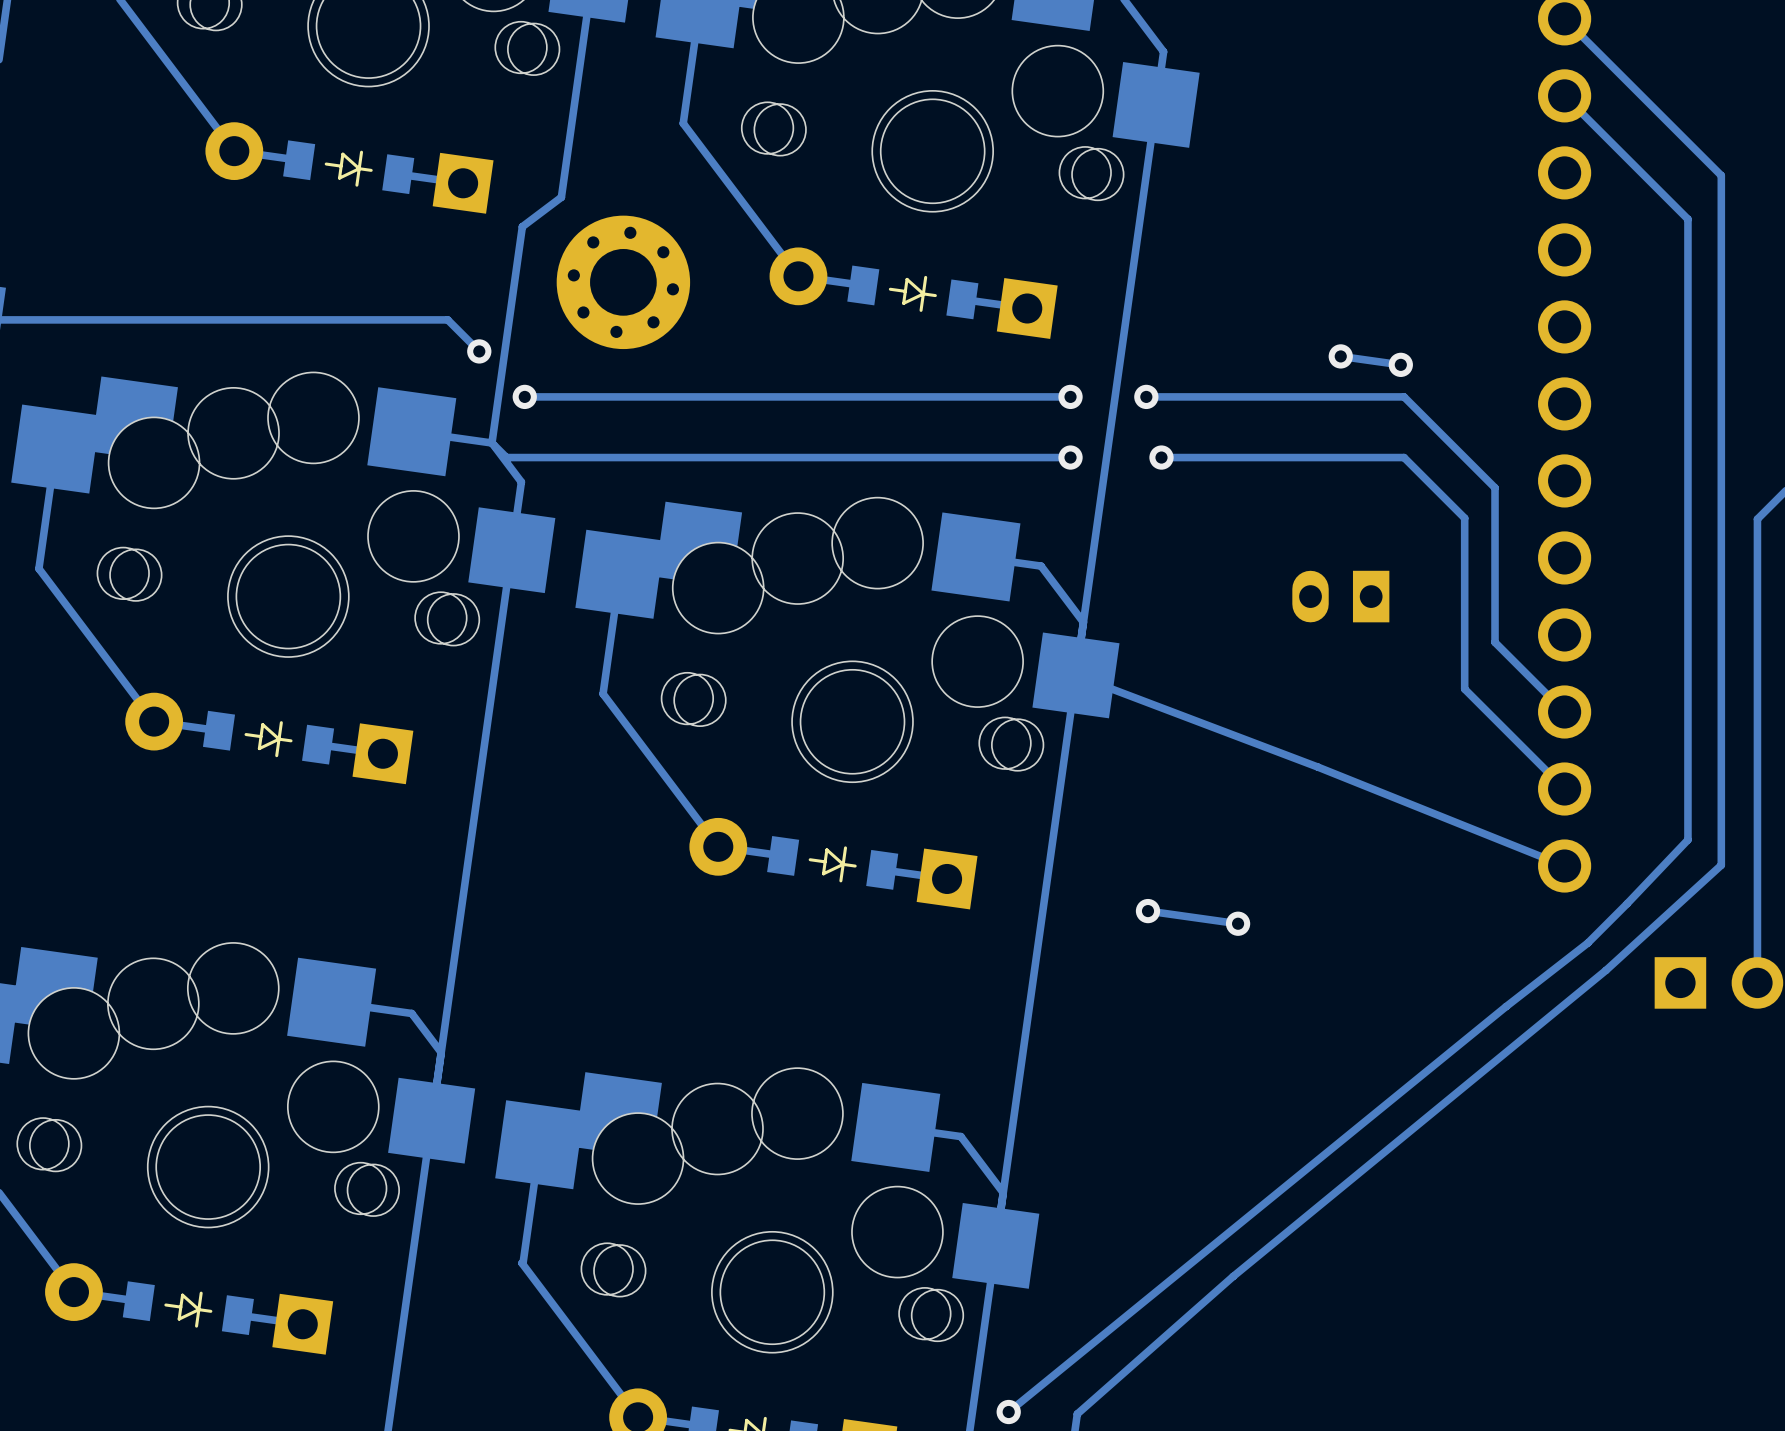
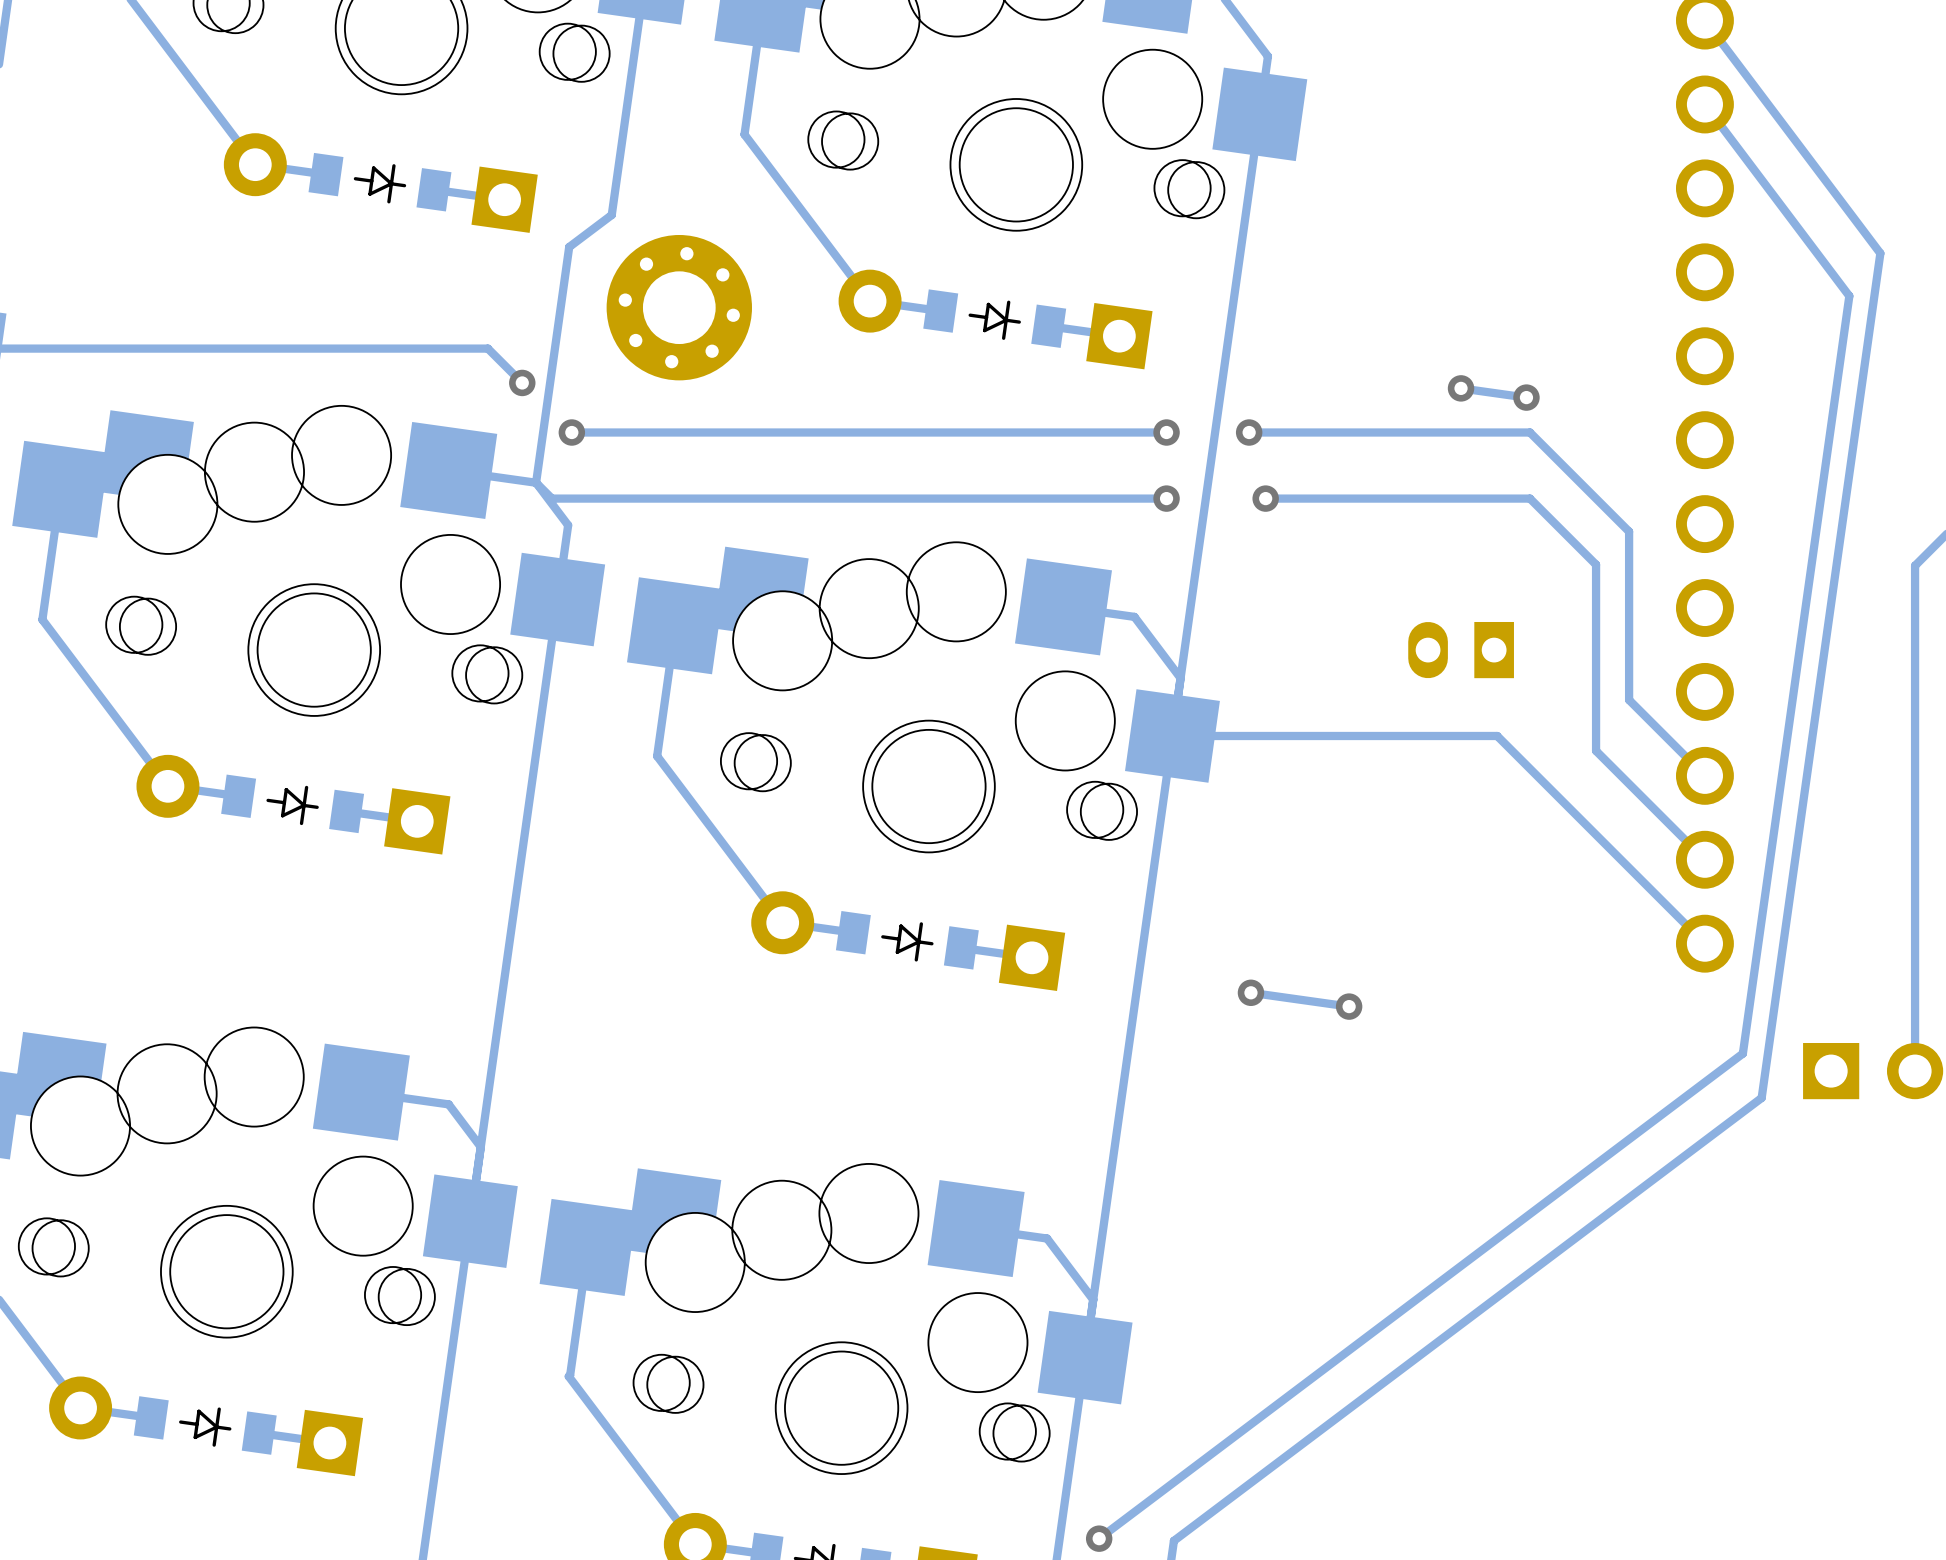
track: (1564, 18) (1721, 175) (1721, 865) (1606, 970) (1233, 1276) (1077, 1414) -> (1704, 20) (1880, 253) (1761, 1097) (1173, 1540)
track: (1564, 95) (1687, 219) (1687, 839) (1587, 943) (1506, 1006) (1008, 1412) -> (1704, 104) (1849, 296) (1742, 1053) (1099, 1538)
track: (1075, 675) (1318, 767) (1564, 866) -> (1172, 735) (1497, 735) (1704, 943)

